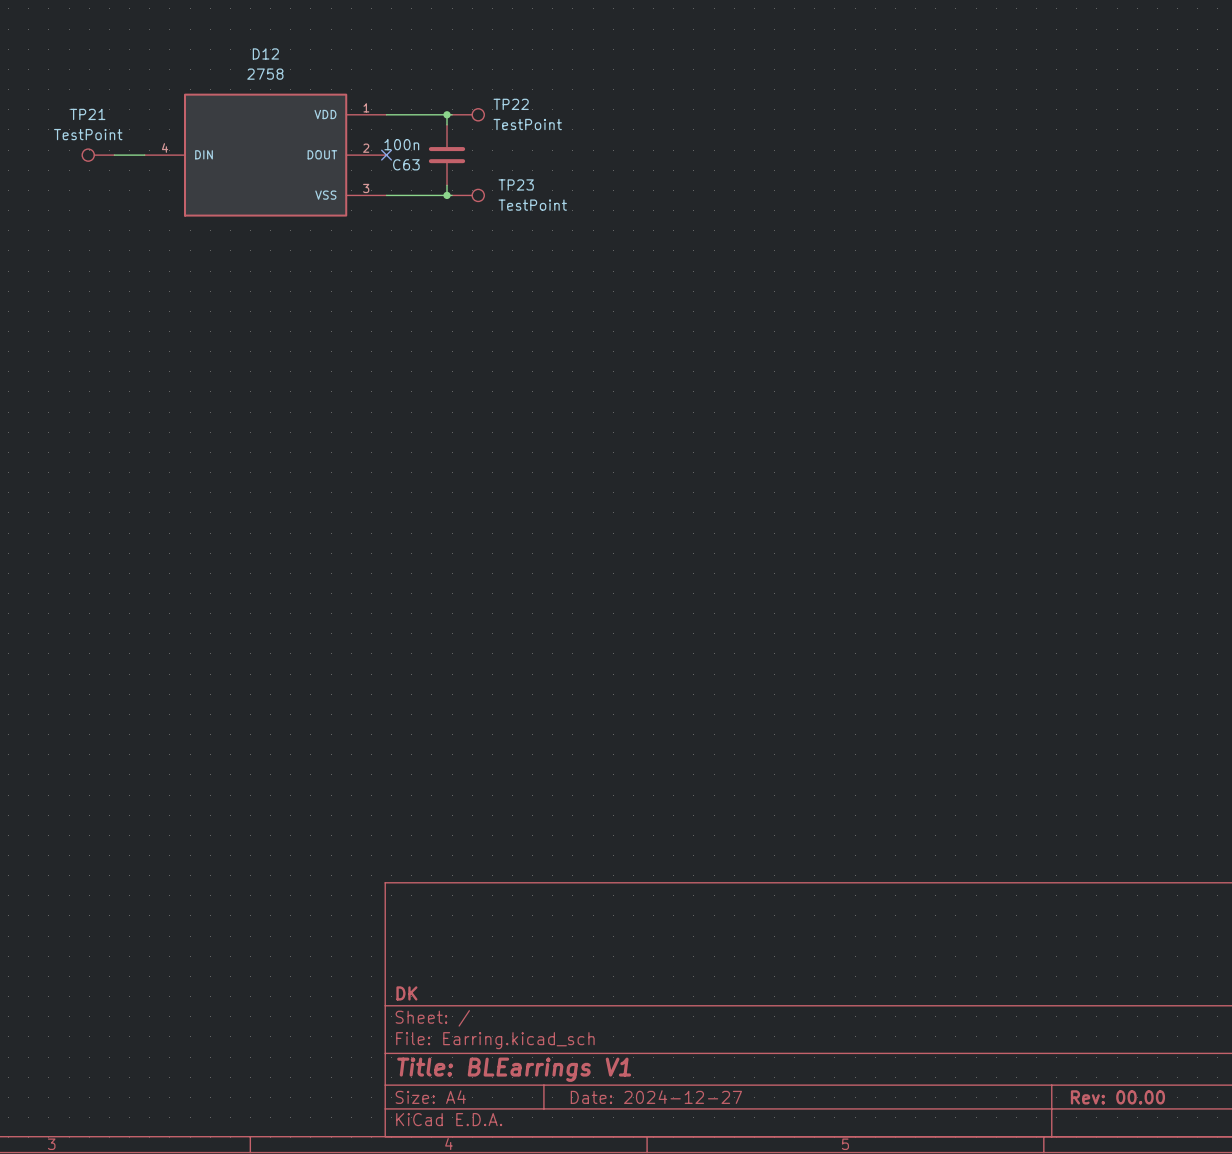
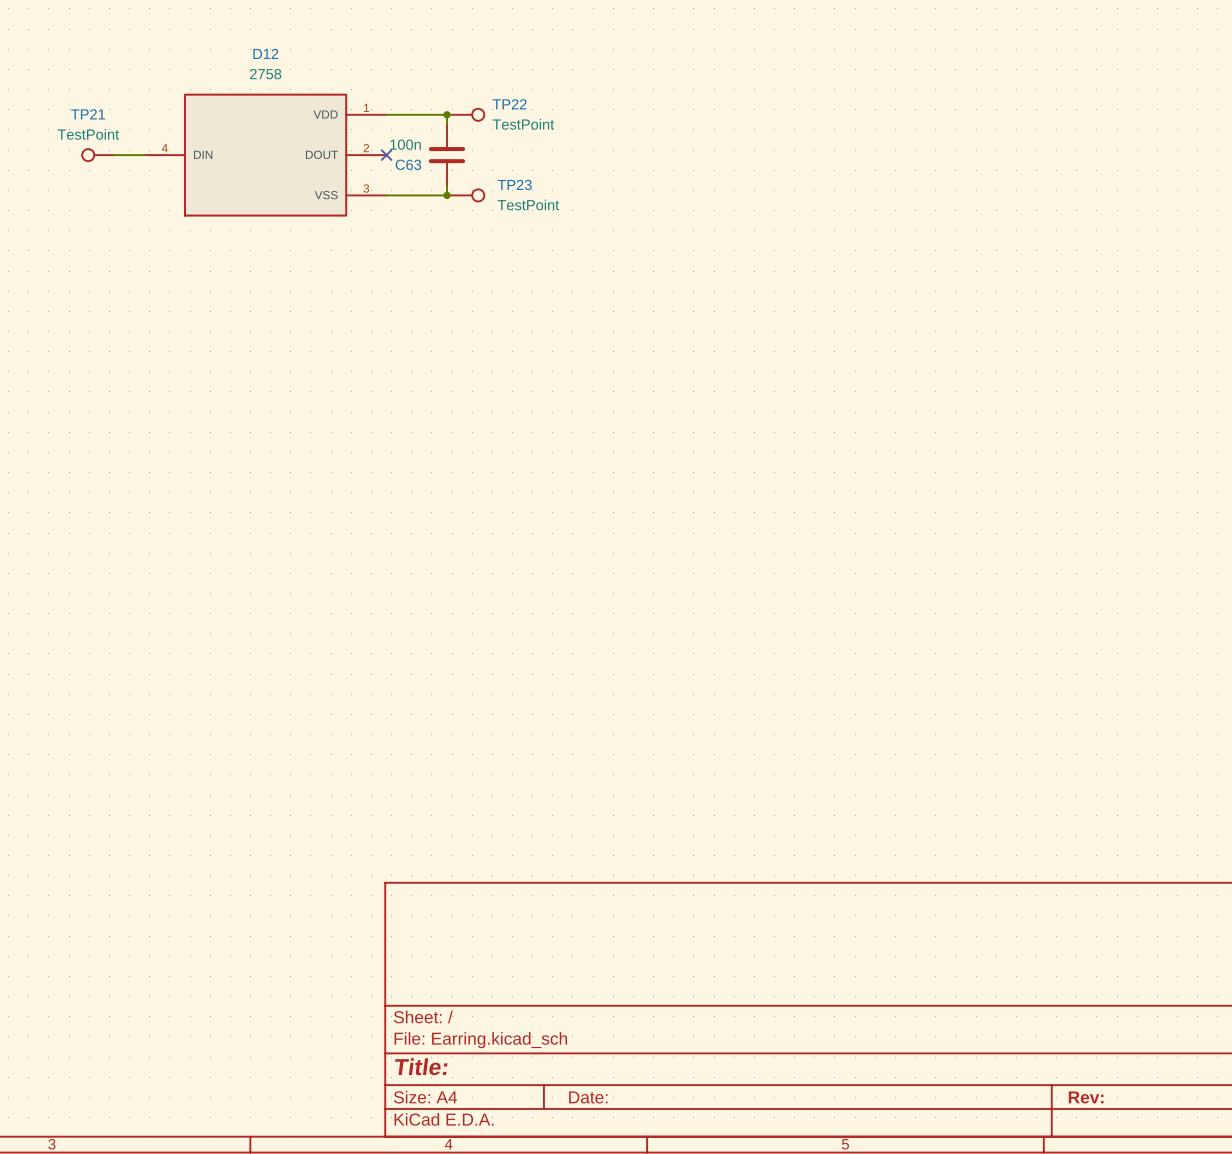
title block: DK (406, 993) -> none
title block: Title: BLEarrings V1 (514, 1069) -> Title: (421, 1066)
title block: Date: 2024-12-27 (656, 1097) -> Date: (588, 1097)
title block: Rev: 00.00 (1117, 1097) -> Rev: (1086, 1097)

